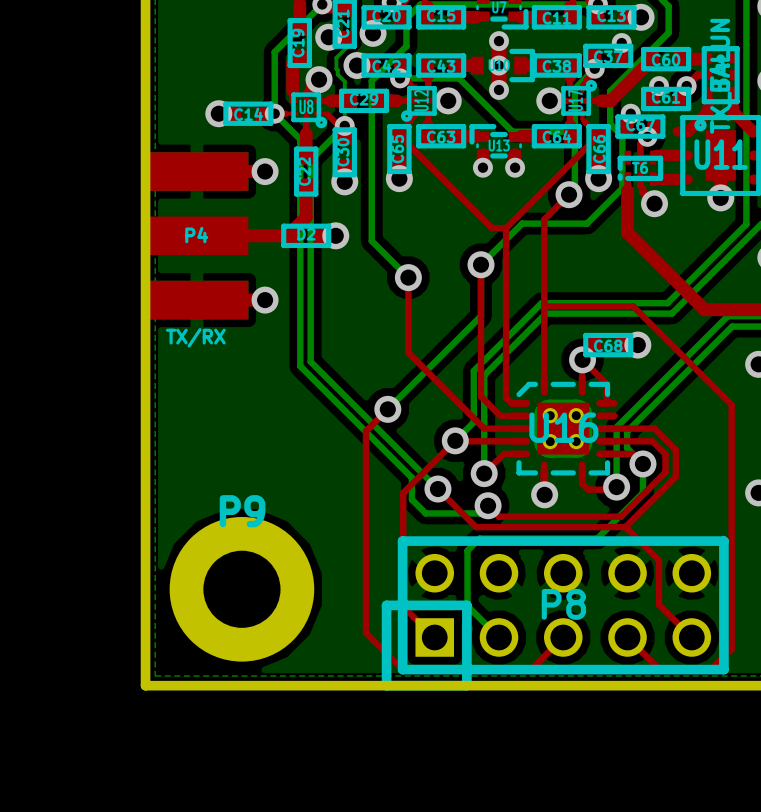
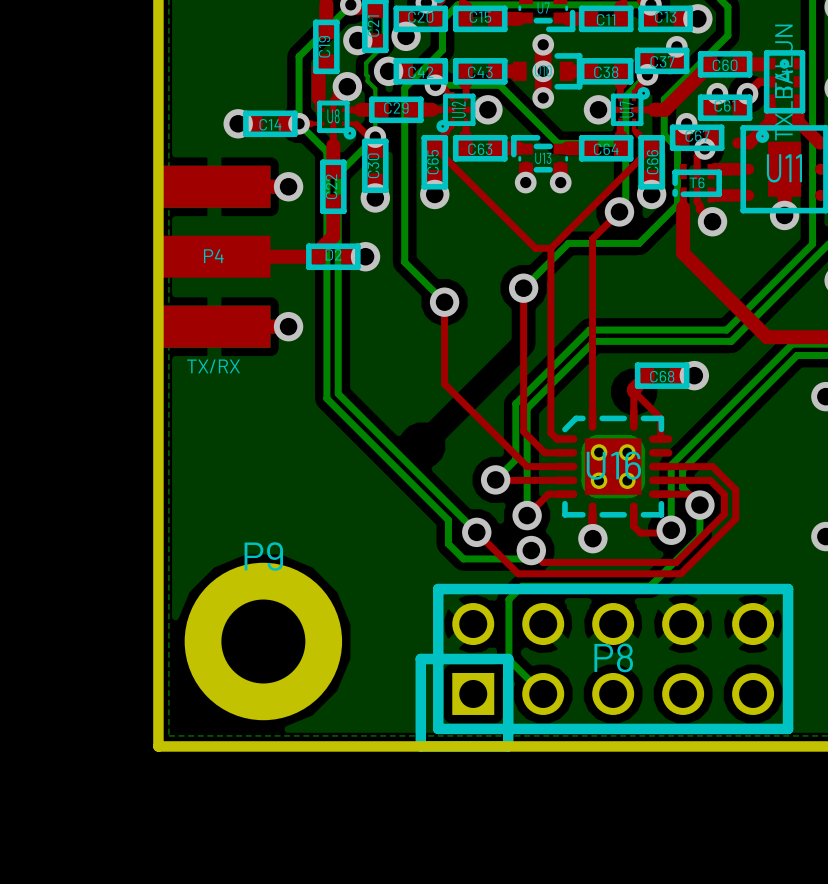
bottom track: (481, 264) (481, 316) (387, 409) -> none
top track: (544, 306) (633, 306) (731, 404) (731, 649) (710, 670) (660, 670) (627, 637) -> none
via: (582, 359) -> none
top track: (387, 409) (365, 431) (365, 632) (402, 669) (531, 669) (563, 637) -> none
via: (387, 409) -> none
top track: (455, 440) (403, 492) (403, 606) (434, 637) -> none
top track: (625, 527) (659, 560) (659, 604) (691, 637) -> none

